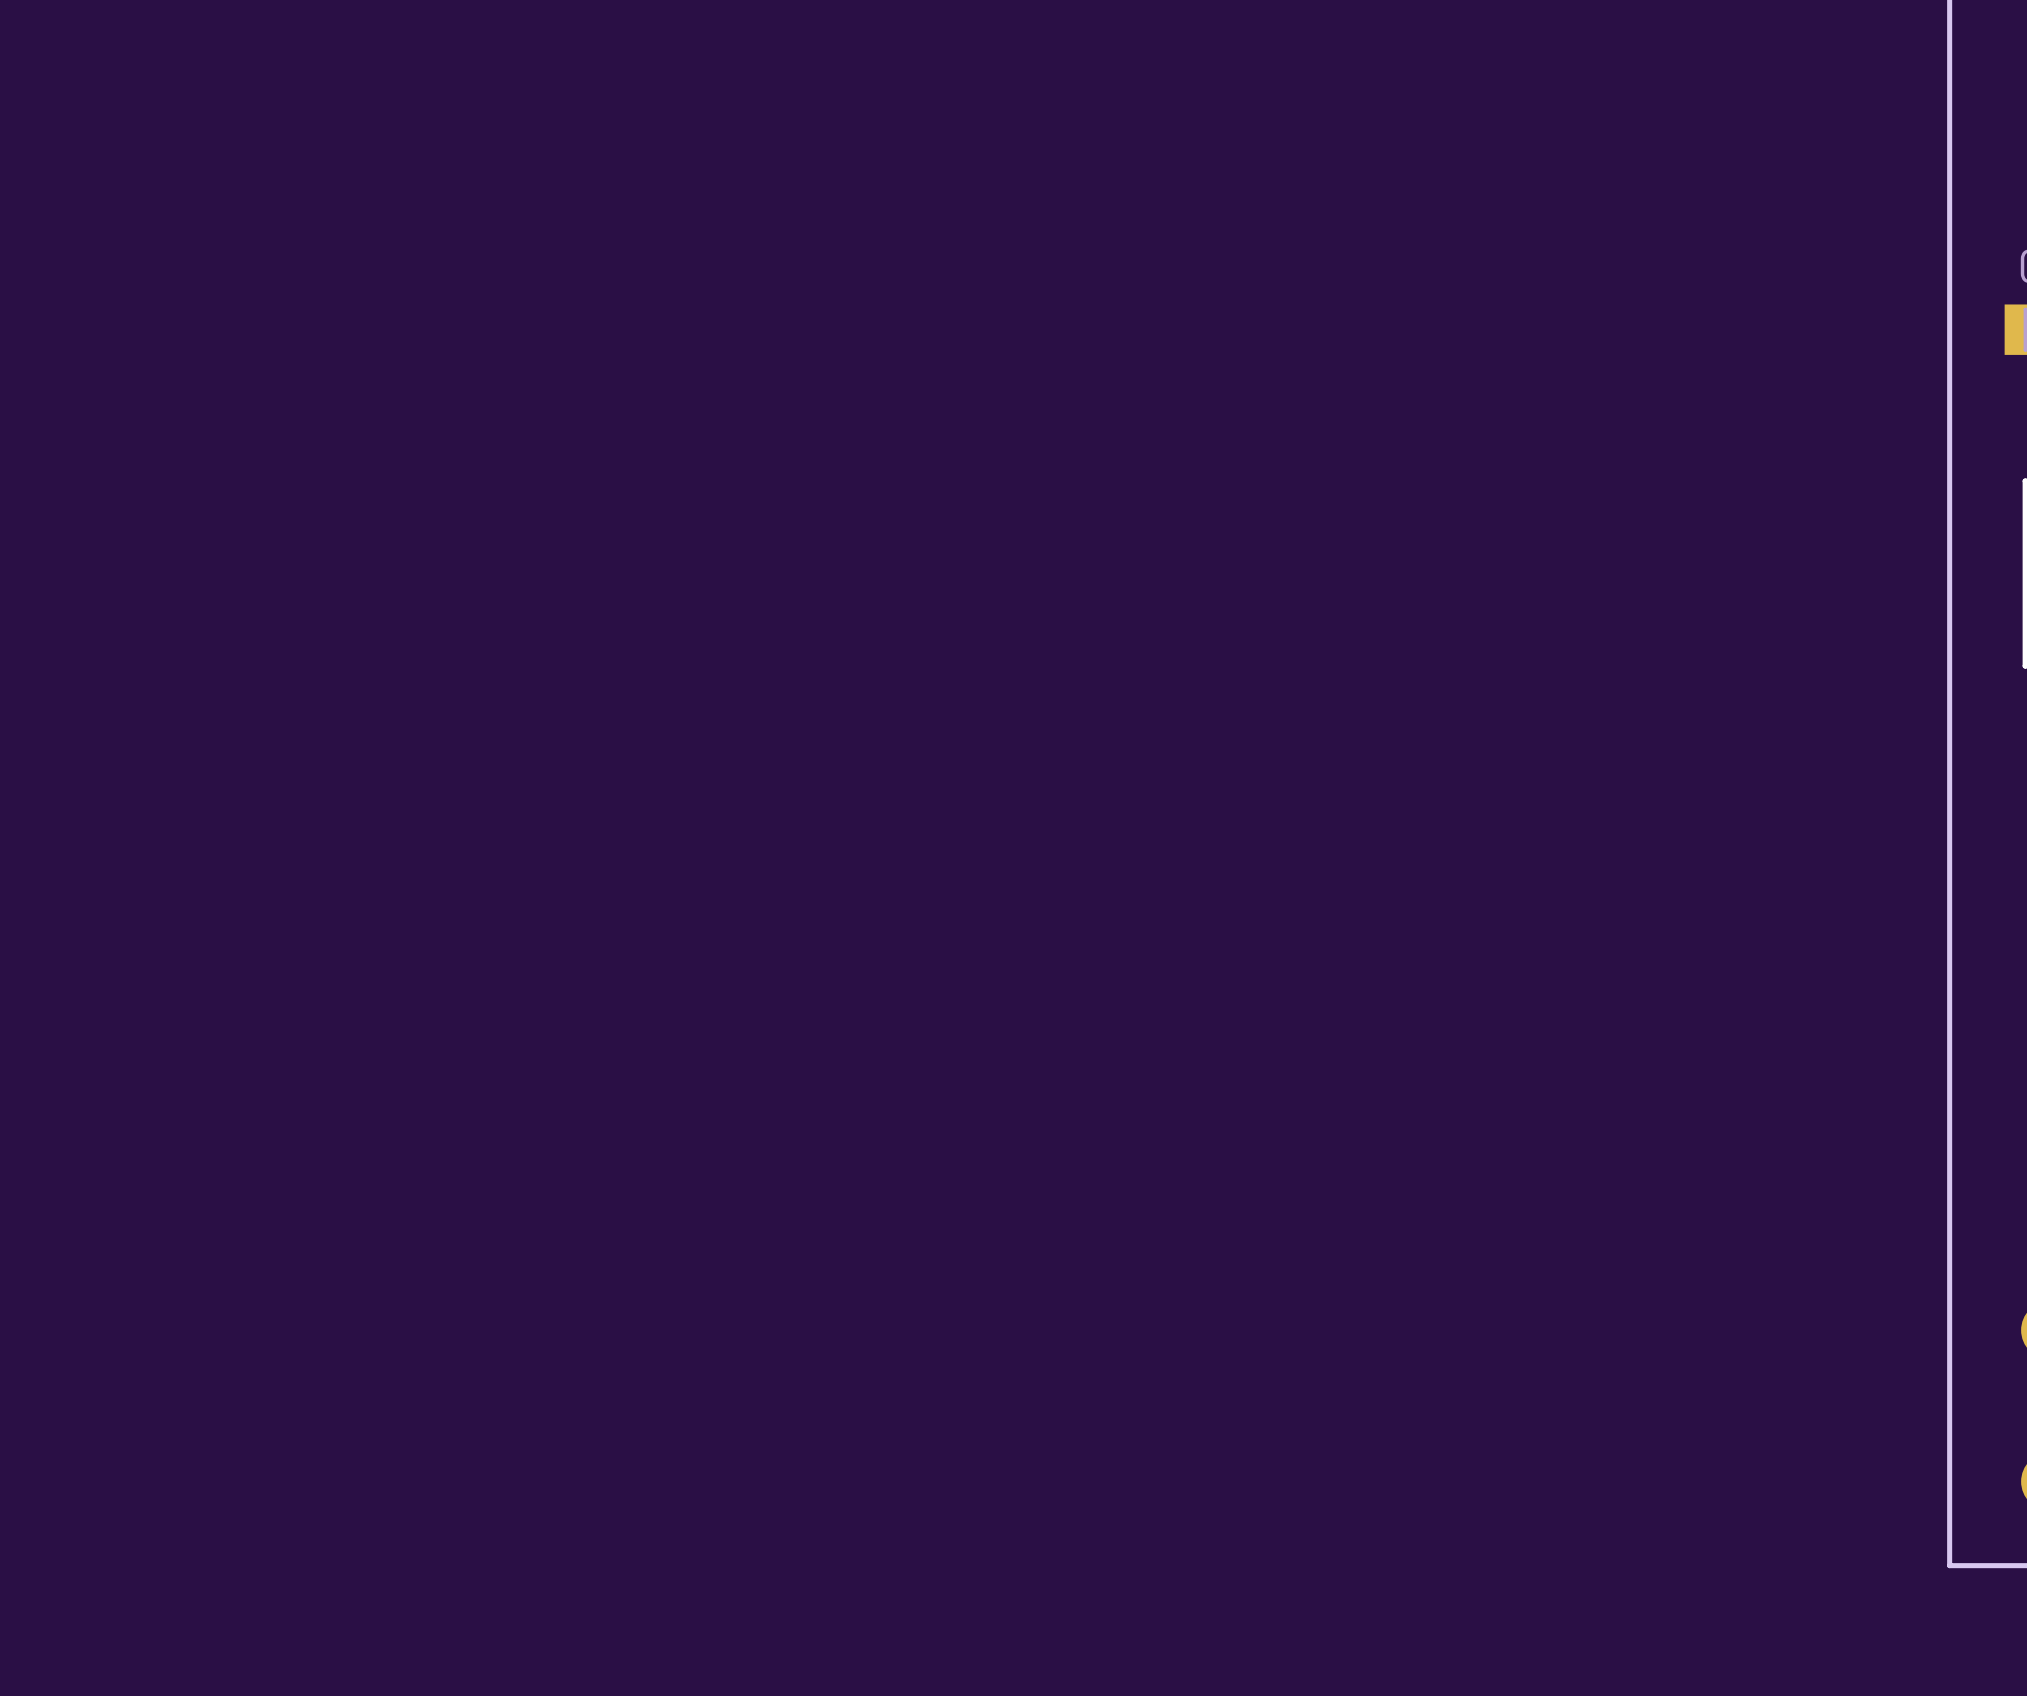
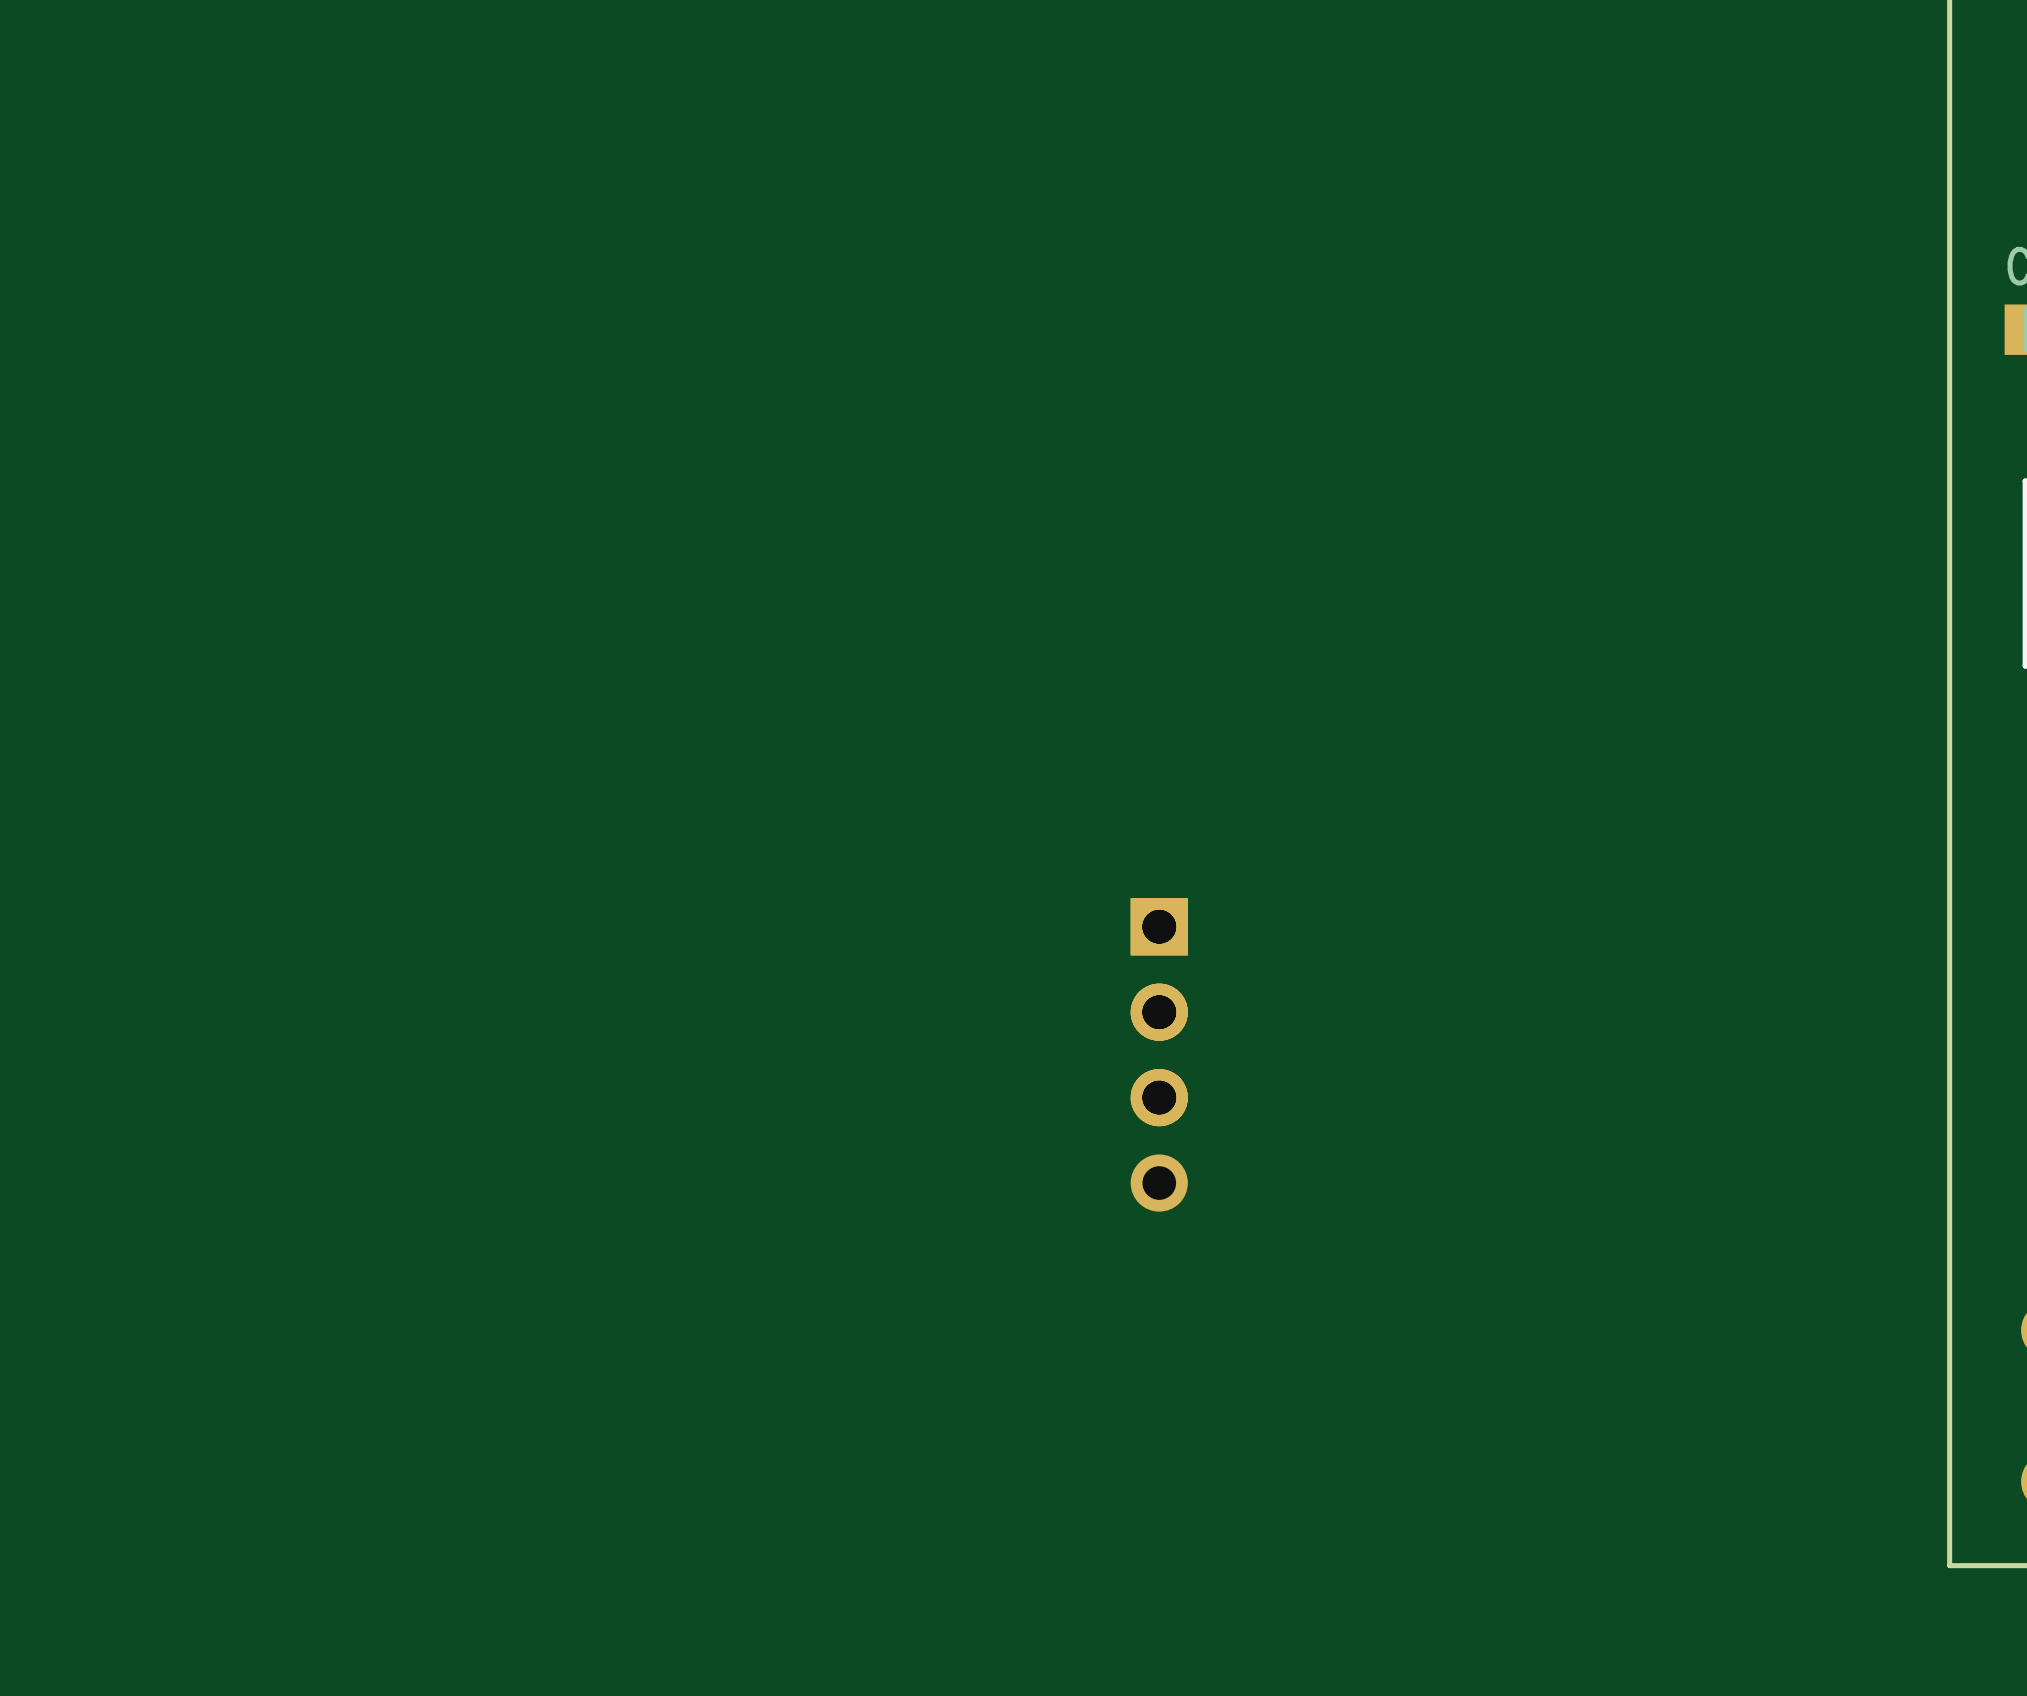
part: none -> (1159, 1012)
part: none -> (1159, 1054)

